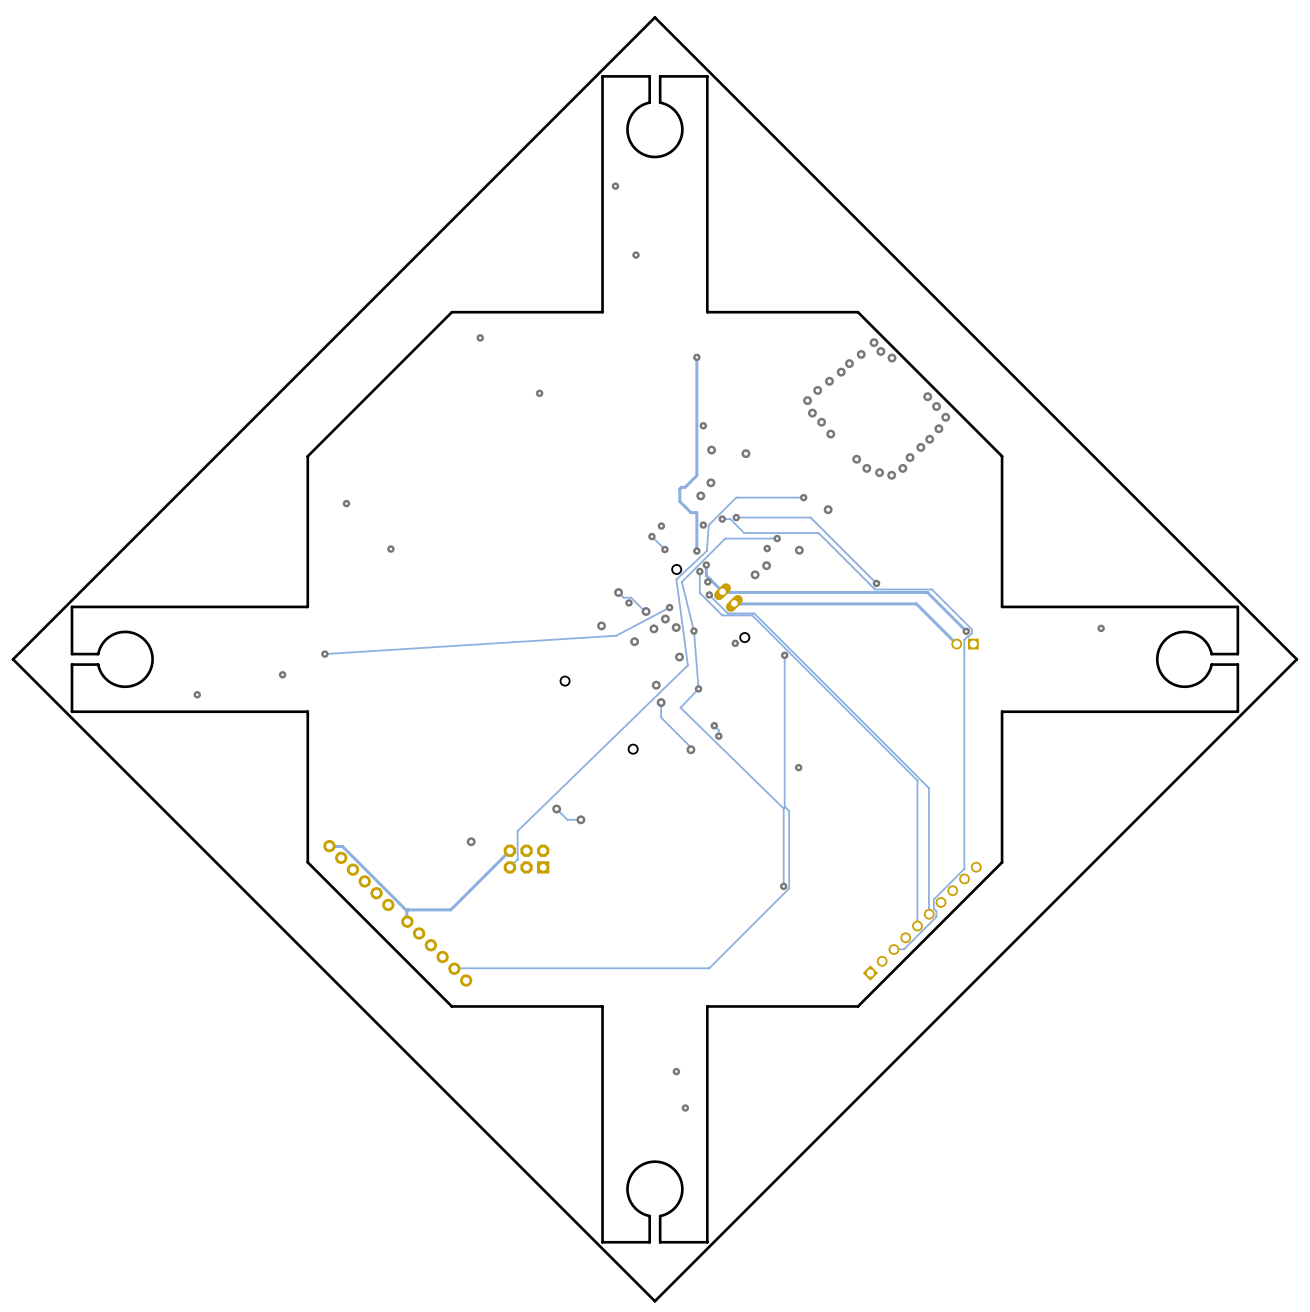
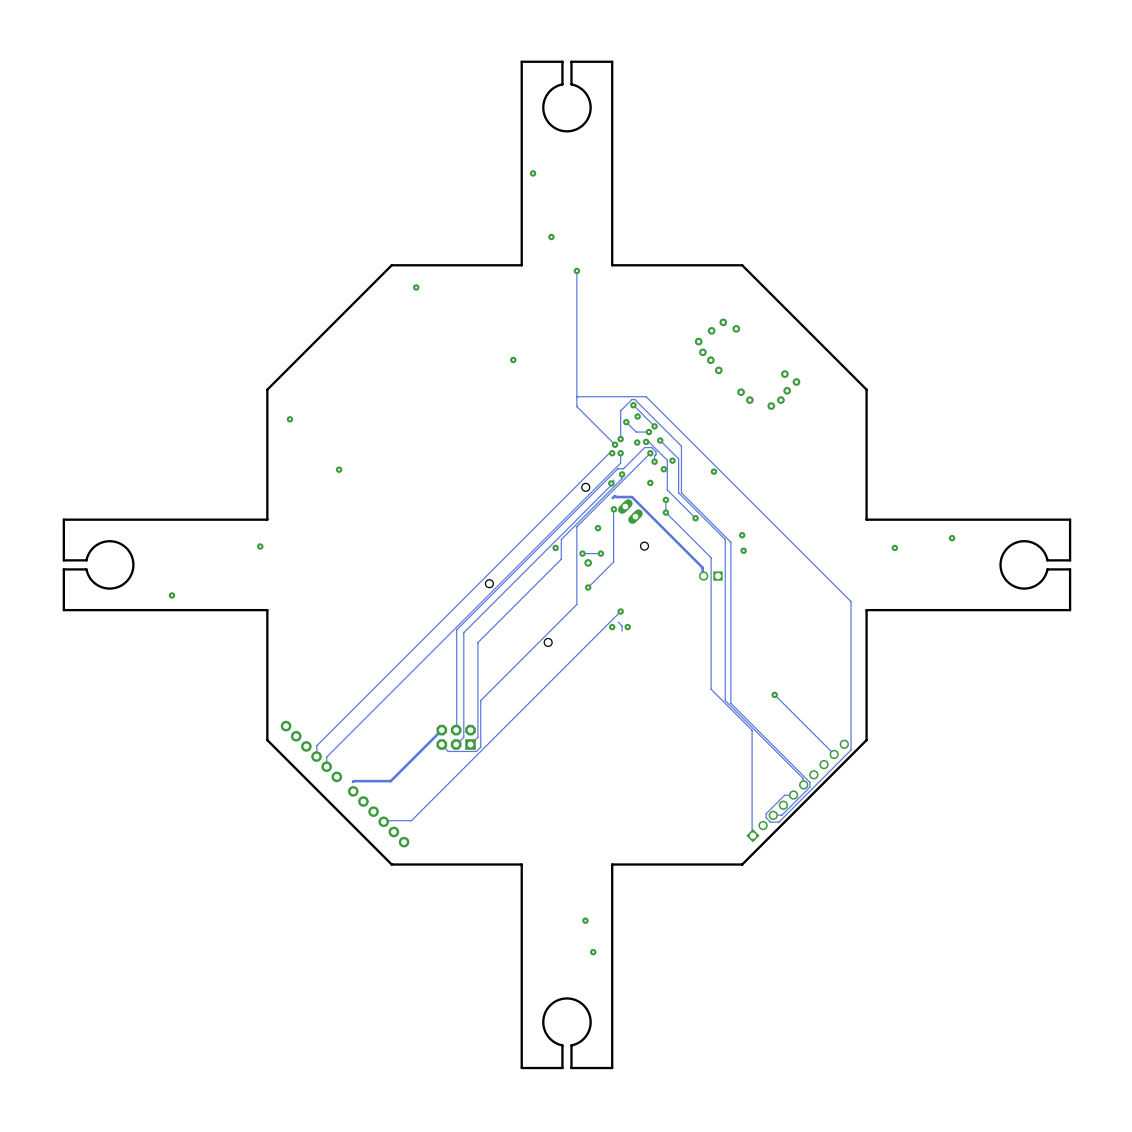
board edge: (654, 17) (13, 659) (654, 1301) (1296, 659) (654, 17) -> none
via position: (615, 186) -> (533, 173)
via position: (635, 255) -> (551, 237)
track: none -> (576, 270) (576, 406) (615, 444)
via: none -> (576, 270)
via: (874, 342) -> none
via: (880, 351) -> none
via: (861, 354) -> none
track: (696, 357) (696, 475) (685, 487) (679, 489) (679, 501) (690, 512) (696, 512) (696, 551) -> none
via: (696, 357) -> none
via: (892, 358) -> none
via: (849, 363) -> none
via: (841, 372) -> none
via: none -> (723, 322)
via: (829, 381) -> none
via: none -> (736, 328)
via: none -> (711, 330)
via: (817, 390) -> none
via: (539, 393) -> none
via: (927, 396) -> none
via: (936, 406) -> none
via: (945, 417) -> none
via: none -> (513, 359)
via: (703, 425) -> none
via: (938, 428) -> none
via: none -> (784, 374)
via: (929, 439) -> none
via: (711, 450) -> none
via: (745, 453) -> none
via: (879, 472) -> none
track: none -> (633, 405) (654, 426)
via: none -> (633, 405)
via: (710, 482) -> none
via: none -> (637, 416)
track: none -> (626, 422) (636, 432) (648, 432)
via: none -> (626, 422)
via: (700, 495) -> none
track: (803, 497) (736, 497) (708, 525) (706, 551) (676, 579) (687, 665) (517, 831) (517, 859) (509, 867) -> (650, 453) (576, 526) (576, 604) (480, 700) (480, 747) (476, 751) (448, 751) (441, 744)
via: (803, 497) -> none
via: none -> (654, 426)
via position: (346, 503) -> (289, 419)
via: none -> (648, 432)
via: (828, 509) -> none
via: none -> (620, 439)
via: none -> (660, 440)
track: none -> (646, 441) (648, 441) (667, 460) (667, 489) (695, 518)
via: none -> (646, 441)
track: (736, 517) (810, 517) (876, 583) -> none
track: (722, 519) (730, 519) (744, 533) (818, 533) (875, 589) (931, 589) (971, 629) (971, 633) (964, 639) (964, 868) (933, 899) (933, 908) -> (620, 439) (620, 410) (631, 399) (634, 399) (681, 446) (681, 492) (730, 542) (730, 703) (807, 780)
via: (722, 519) -> none
via: none -> (615, 444)
via: (703, 525) -> none
via: (661, 526) -> none
track: none -> (612, 453) (609, 453) (316, 745) (316, 756)
via: none -> (612, 453)
track: none -> (620, 453) (620, 463) (326, 757) (326, 766)
via: none -> (620, 453)
via: none -> (650, 453)
track: (651, 536) (664, 549) -> none
via: (651, 536) -> none
track: (777, 538) (725, 538) (681, 581) (693, 631) (698, 688) (680, 707) (783, 808) (783, 886) -> none
track: none -> (654, 461) (656, 451) (651, 447) (644, 447) (623, 468) (617, 468) (456, 629) (456, 730)
via: none -> (654, 461)
via: (664, 549) -> none
via: (799, 550) -> none
via: (696, 551) -> none
via: none -> (713, 471)
track: none -> (622, 474) (622, 478) (561, 539) (561, 559) (477, 642) (477, 737) (470, 744)
via: none -> (622, 474)
track: none -> (613, 480) (613, 482) (463, 632) (463, 737) (456, 744)
via: none -> (650, 482)
track: (706, 565) (706, 575) (723, 592) (927, 592) (966, 631) -> none
via: (766, 565) -> none
track: (699, 571) (699, 592) (722, 615) (752, 615) (917, 780) (917, 926) -> (576, 396) (646, 396) (851, 601) (851, 750) (778, 822) (770, 822) (766, 817) (766, 813) (784, 795) (793, 795)
via: (699, 571) -> none
via: (755, 574) -> none
track: none -> (615, 496) (631, 497) (702, 567) (703, 576)
via: (707, 581) -> none
via: (876, 583) -> none
track: none -> (665, 499) (665, 512) (711, 557) (711, 689) (752, 730) (752, 835)
via: none -> (665, 499)
track: (618, 592) (623, 597) (631, 597) (646, 611) -> none
via: (618, 592) -> none
track: (709, 594) (727, 613) (754, 613) (928, 788) (929, 914) -> (660, 440) (678, 458) (678, 492) (725, 539) (725, 700) (802, 778) (803, 784)
track: none -> (613, 509) (613, 562) (588, 587)
via: none -> (665, 512)
via: (628, 602) -> none
track: (734, 603) (916, 603) (956, 644) -> none
via: none -> (695, 518)
track: (669, 607) (616, 635) (324, 654) -> none
via: (669, 607) -> none
via: (646, 611) -> none
via: none -> (598, 528)
via: (665, 619) -> none
via: none -> (742, 535)
via: (601, 625) -> none
via: (676, 627) -> none
via: (653, 628) -> none
via: (693, 631) -> none
via: (966, 631) -> none
via: none -> (260, 546)
via: none -> (555, 547)
via: none -> (894, 547)
via: (634, 641) -> none
via: none -> (743, 550)
via: (735, 643) -> none
part position: (965, 644) -> (710, 576)
via: none -> (582, 553)
track: none -> (600, 553) (582, 553)
via: none -> (600, 553)
via: (324, 654) -> none
track: (784, 655) (784, 806) (789, 811) (789, 888) (709, 968) (454, 968) -> none
via: (784, 655) -> none
via: (282, 674) -> none
via: (656, 685) -> none
via: none -> (588, 587)
via: (698, 688) -> none
track: (661, 702) (661, 717) (690, 747) (690, 749) -> none
via: (661, 702) -> none
track: none -> (620, 611) (411, 820) (383, 821)
via: none -> (620, 611)
via: (714, 725) -> none
via: none -> (612, 627)
via: none -> (627, 627)
via: (718, 736) -> none
via: (690, 749) -> none
via: (798, 767) -> none
track: (556, 808) (567, 819) (580, 819) -> none
via: (556, 808) -> none
track: none -> (774, 694) (834, 754)
via: none -> (774, 694)
via: (580, 819) -> none
via: (471, 841) -> none
track: (329, 846) (342, 846) (406, 910) (407, 921) -> none
via: (783, 886) -> none

